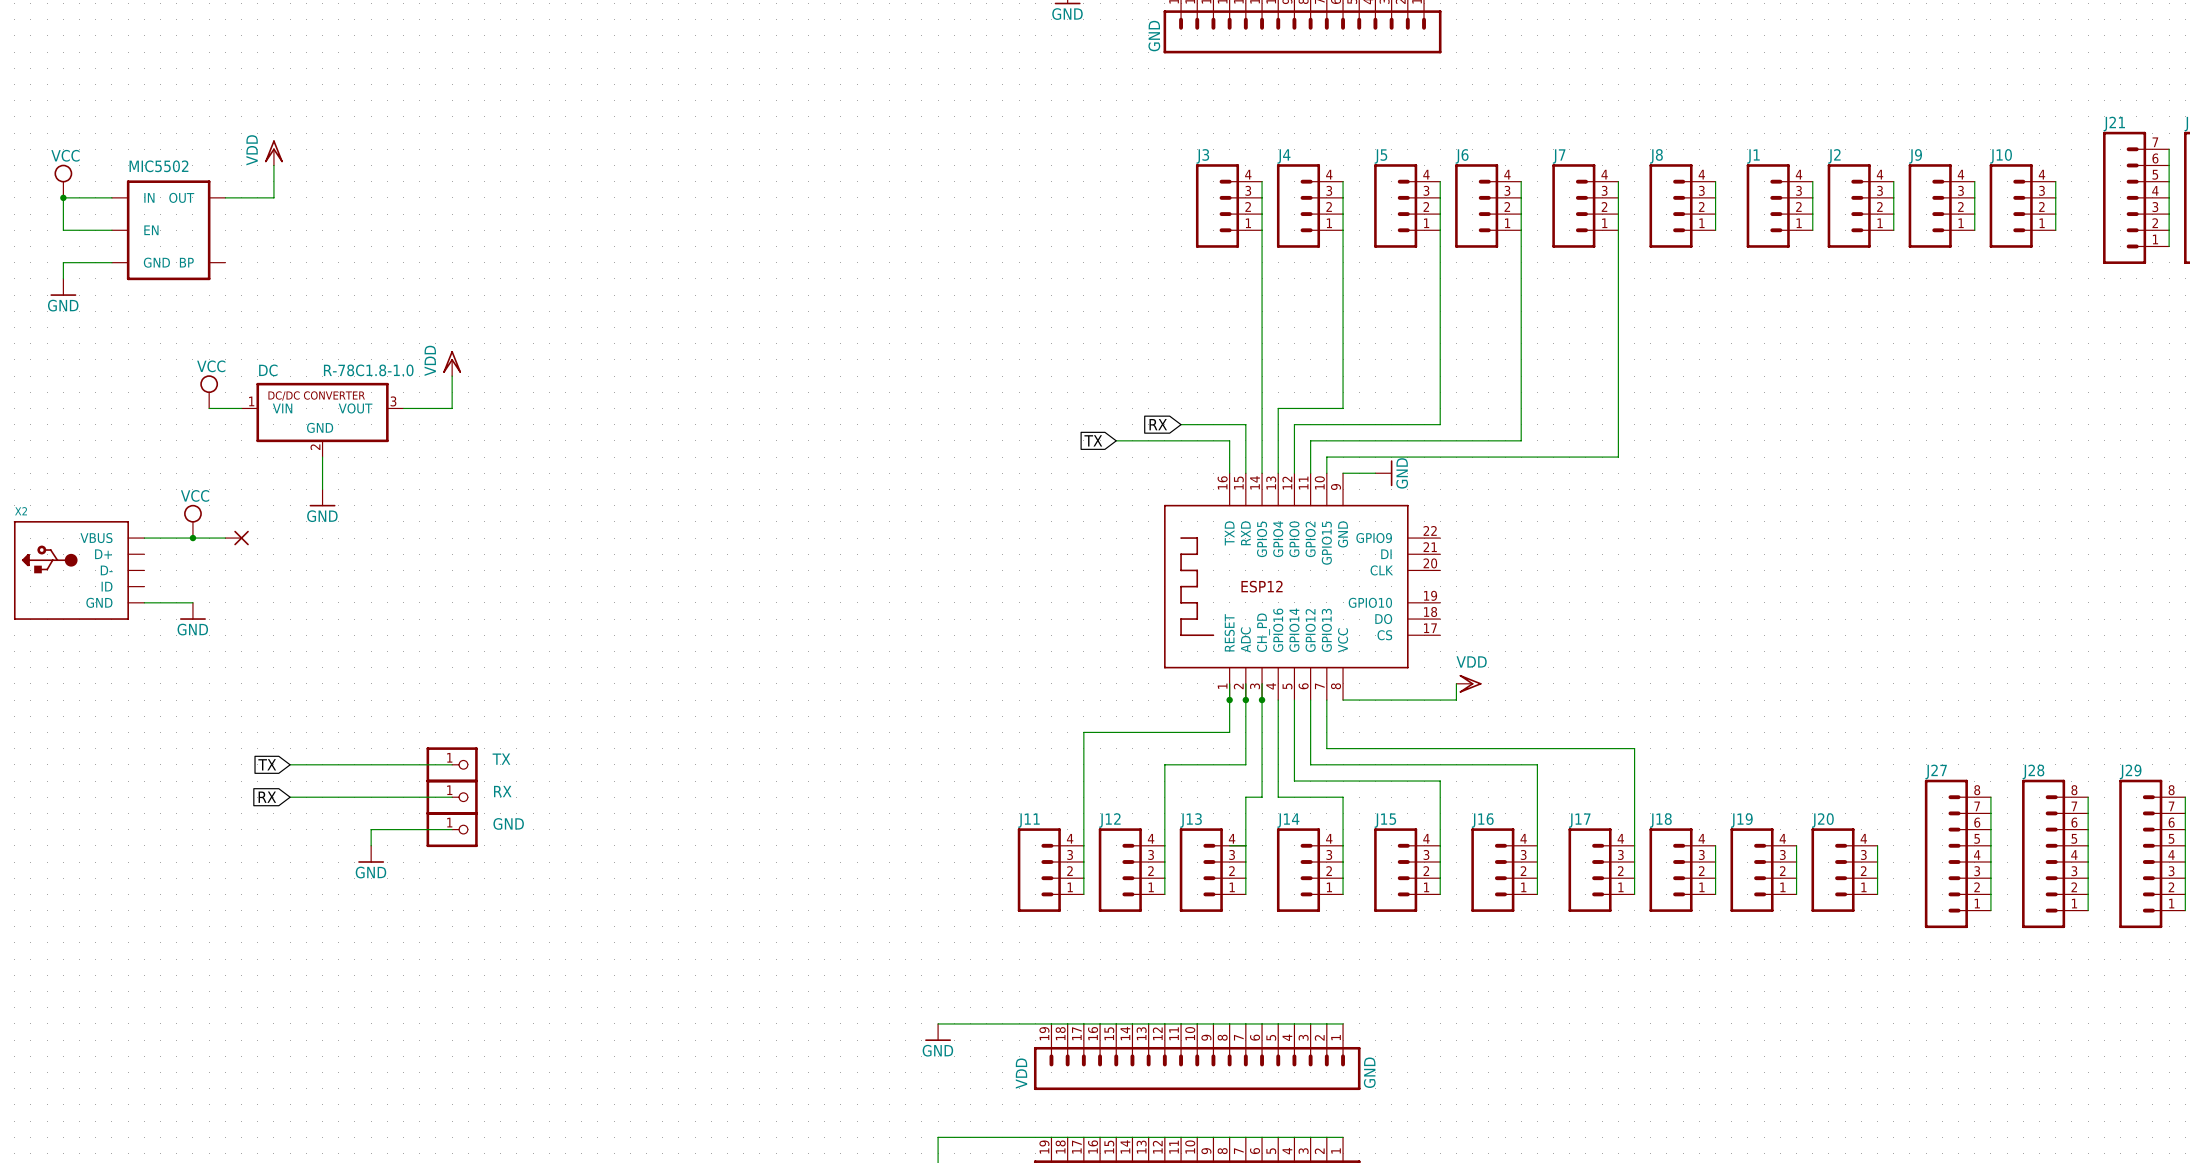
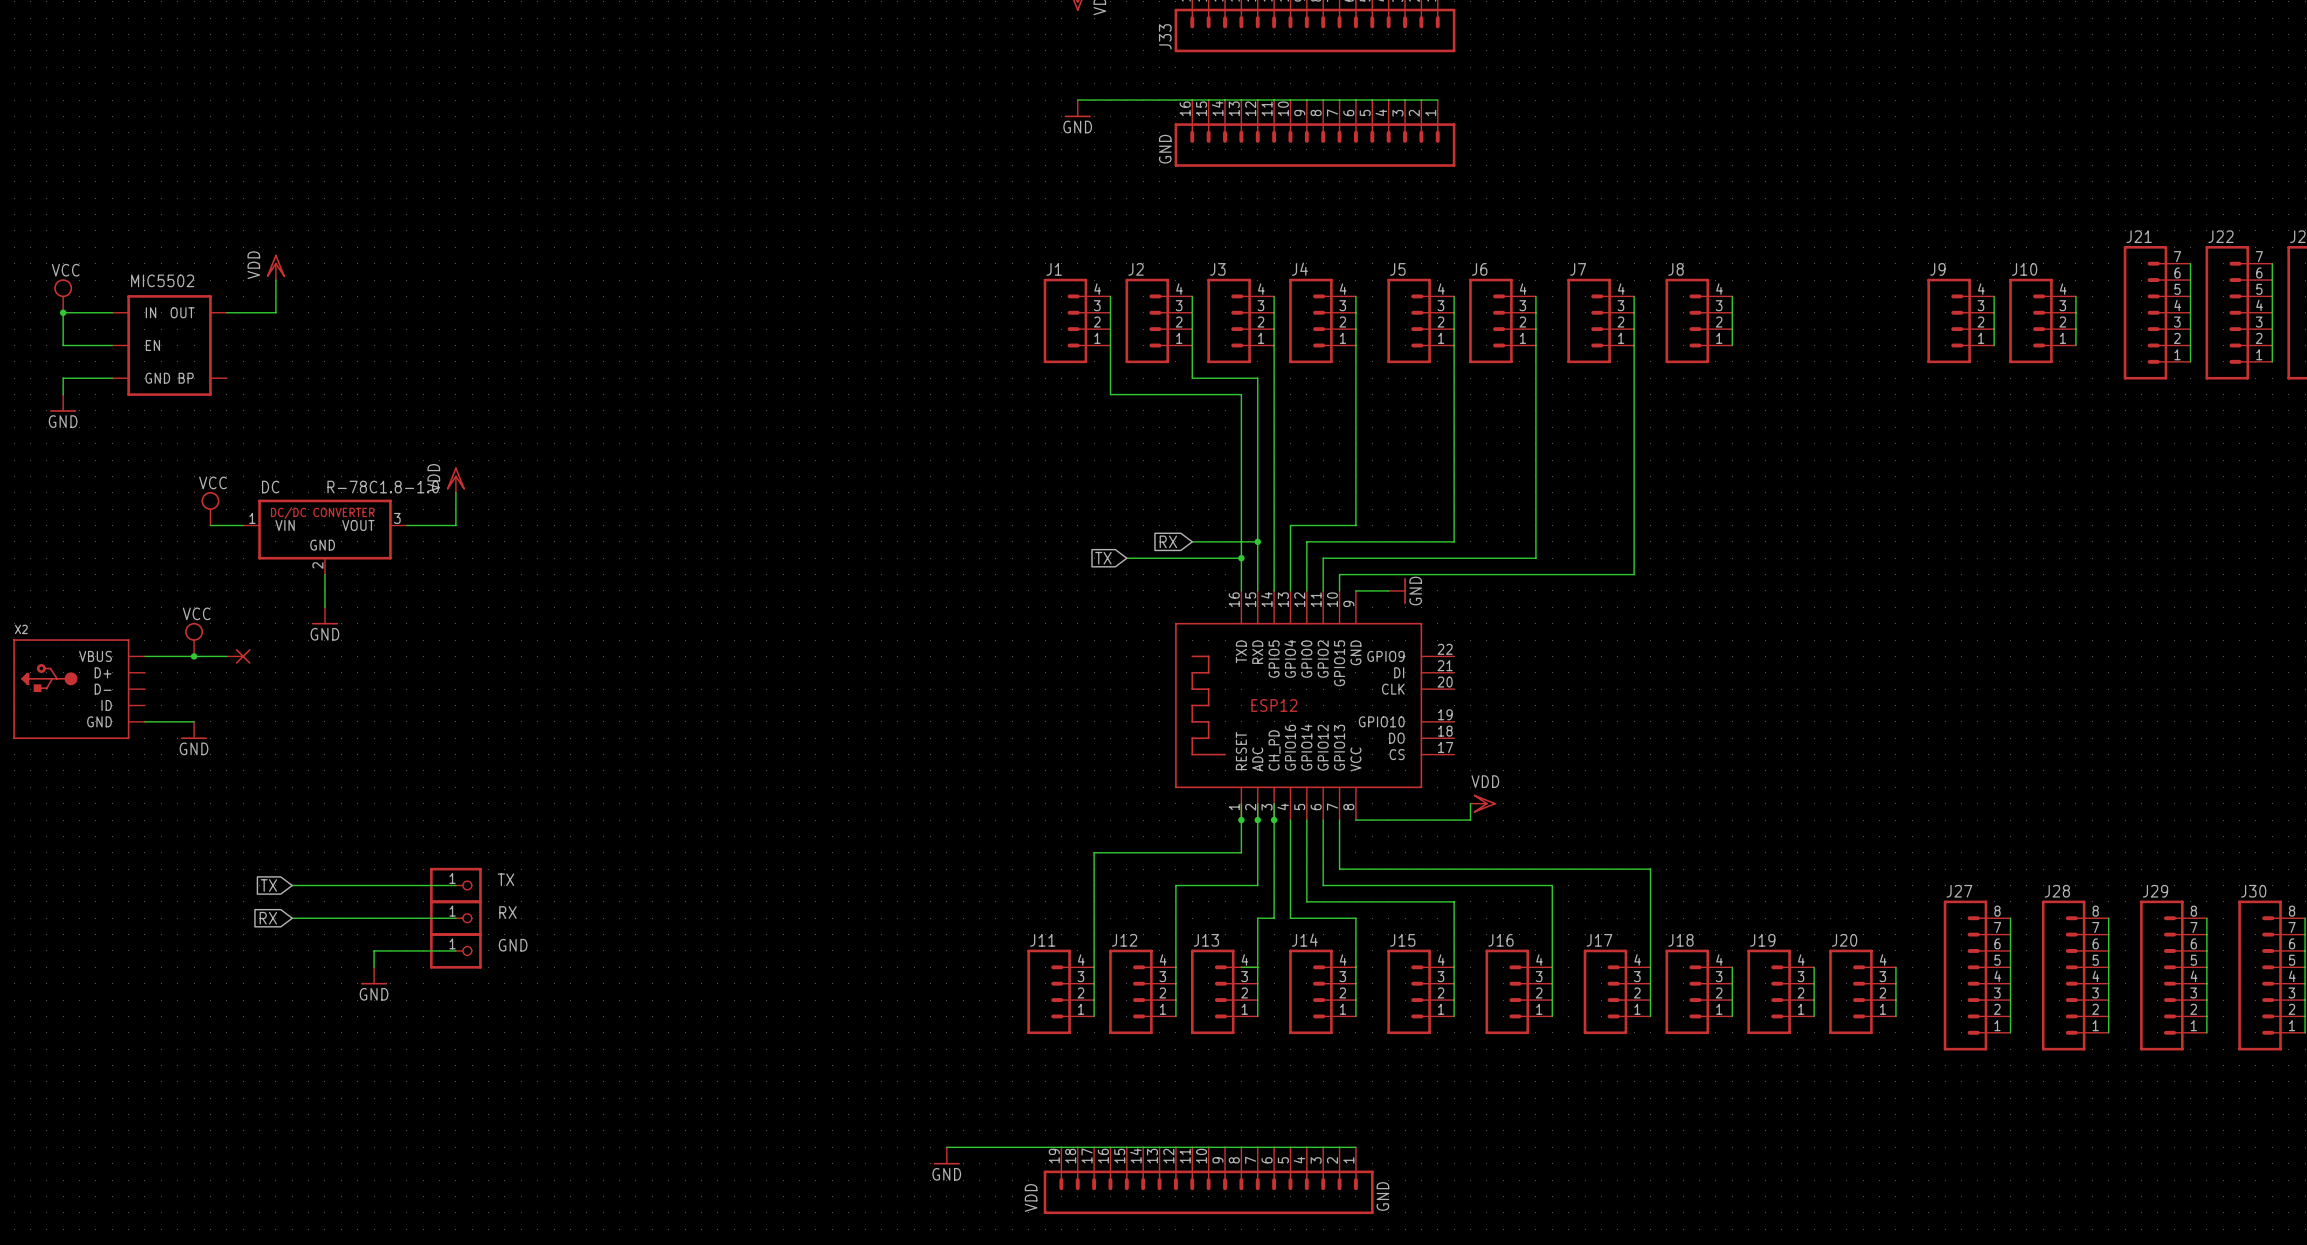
wire: none -> (1110, 296) (1110, 394) (1241, 394) (1241, 558)
wire: none -> (1192, 296) (1192, 378) (1257, 378) (1257, 541)
wire: (1812, 181) (1812, 230) -> none
wire: (1893, 181) (1893, 230) -> none
J1 position: (1779, 205) -> (1077, 320)
J2 position: (1860, 205) -> (1158, 320)
junction: none -> (1257, 541)
junction: none -> (1241, 558)

